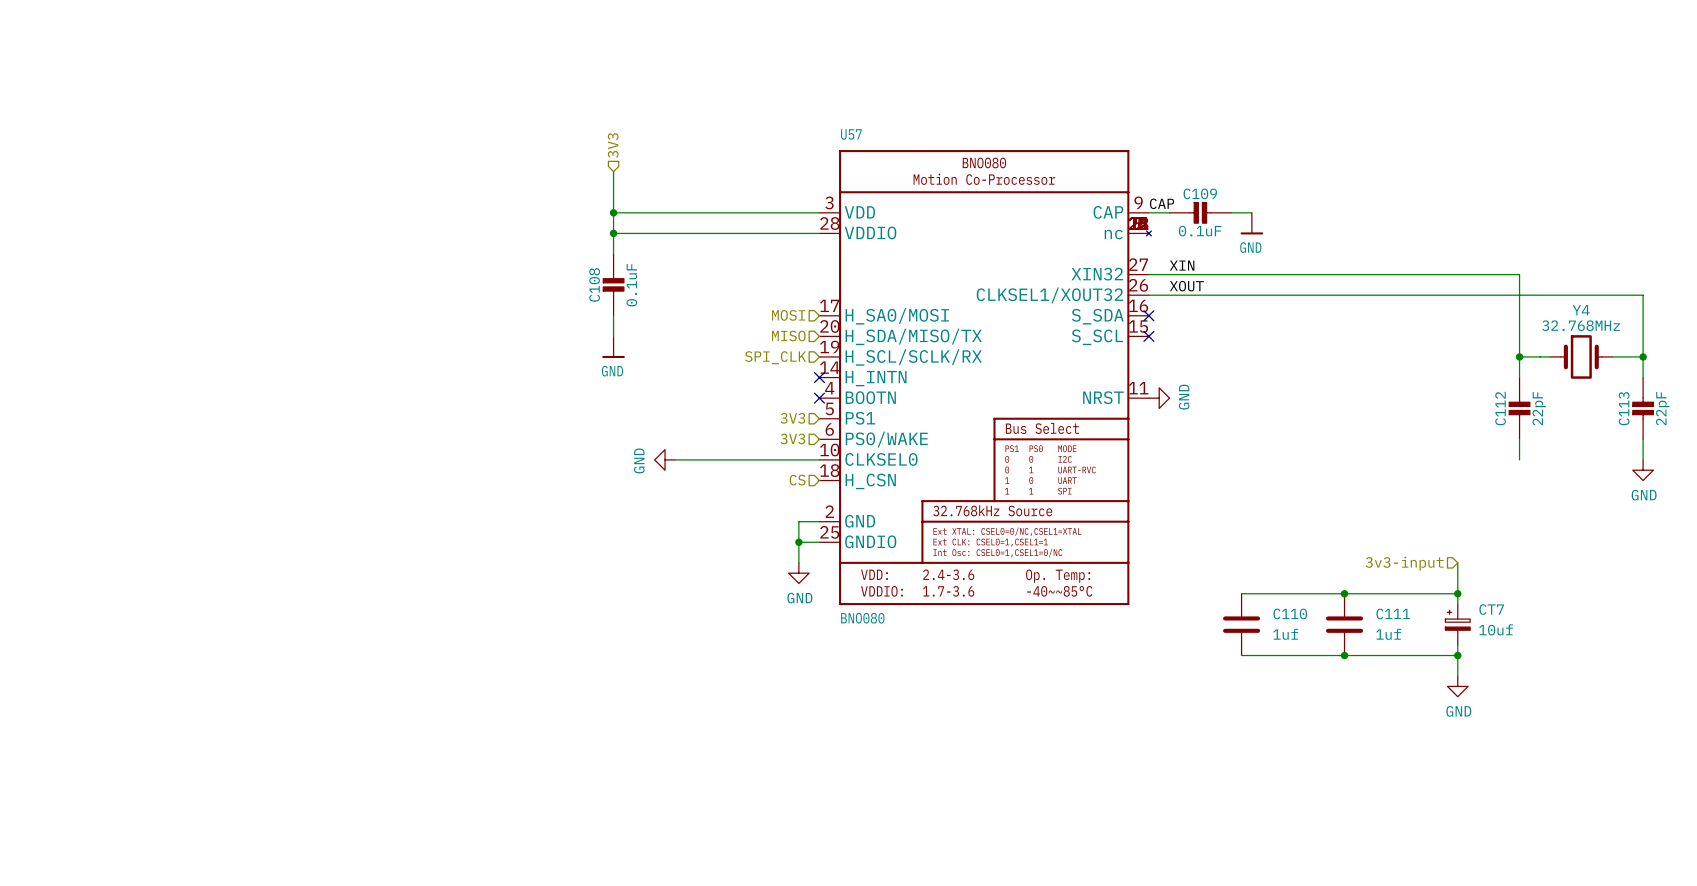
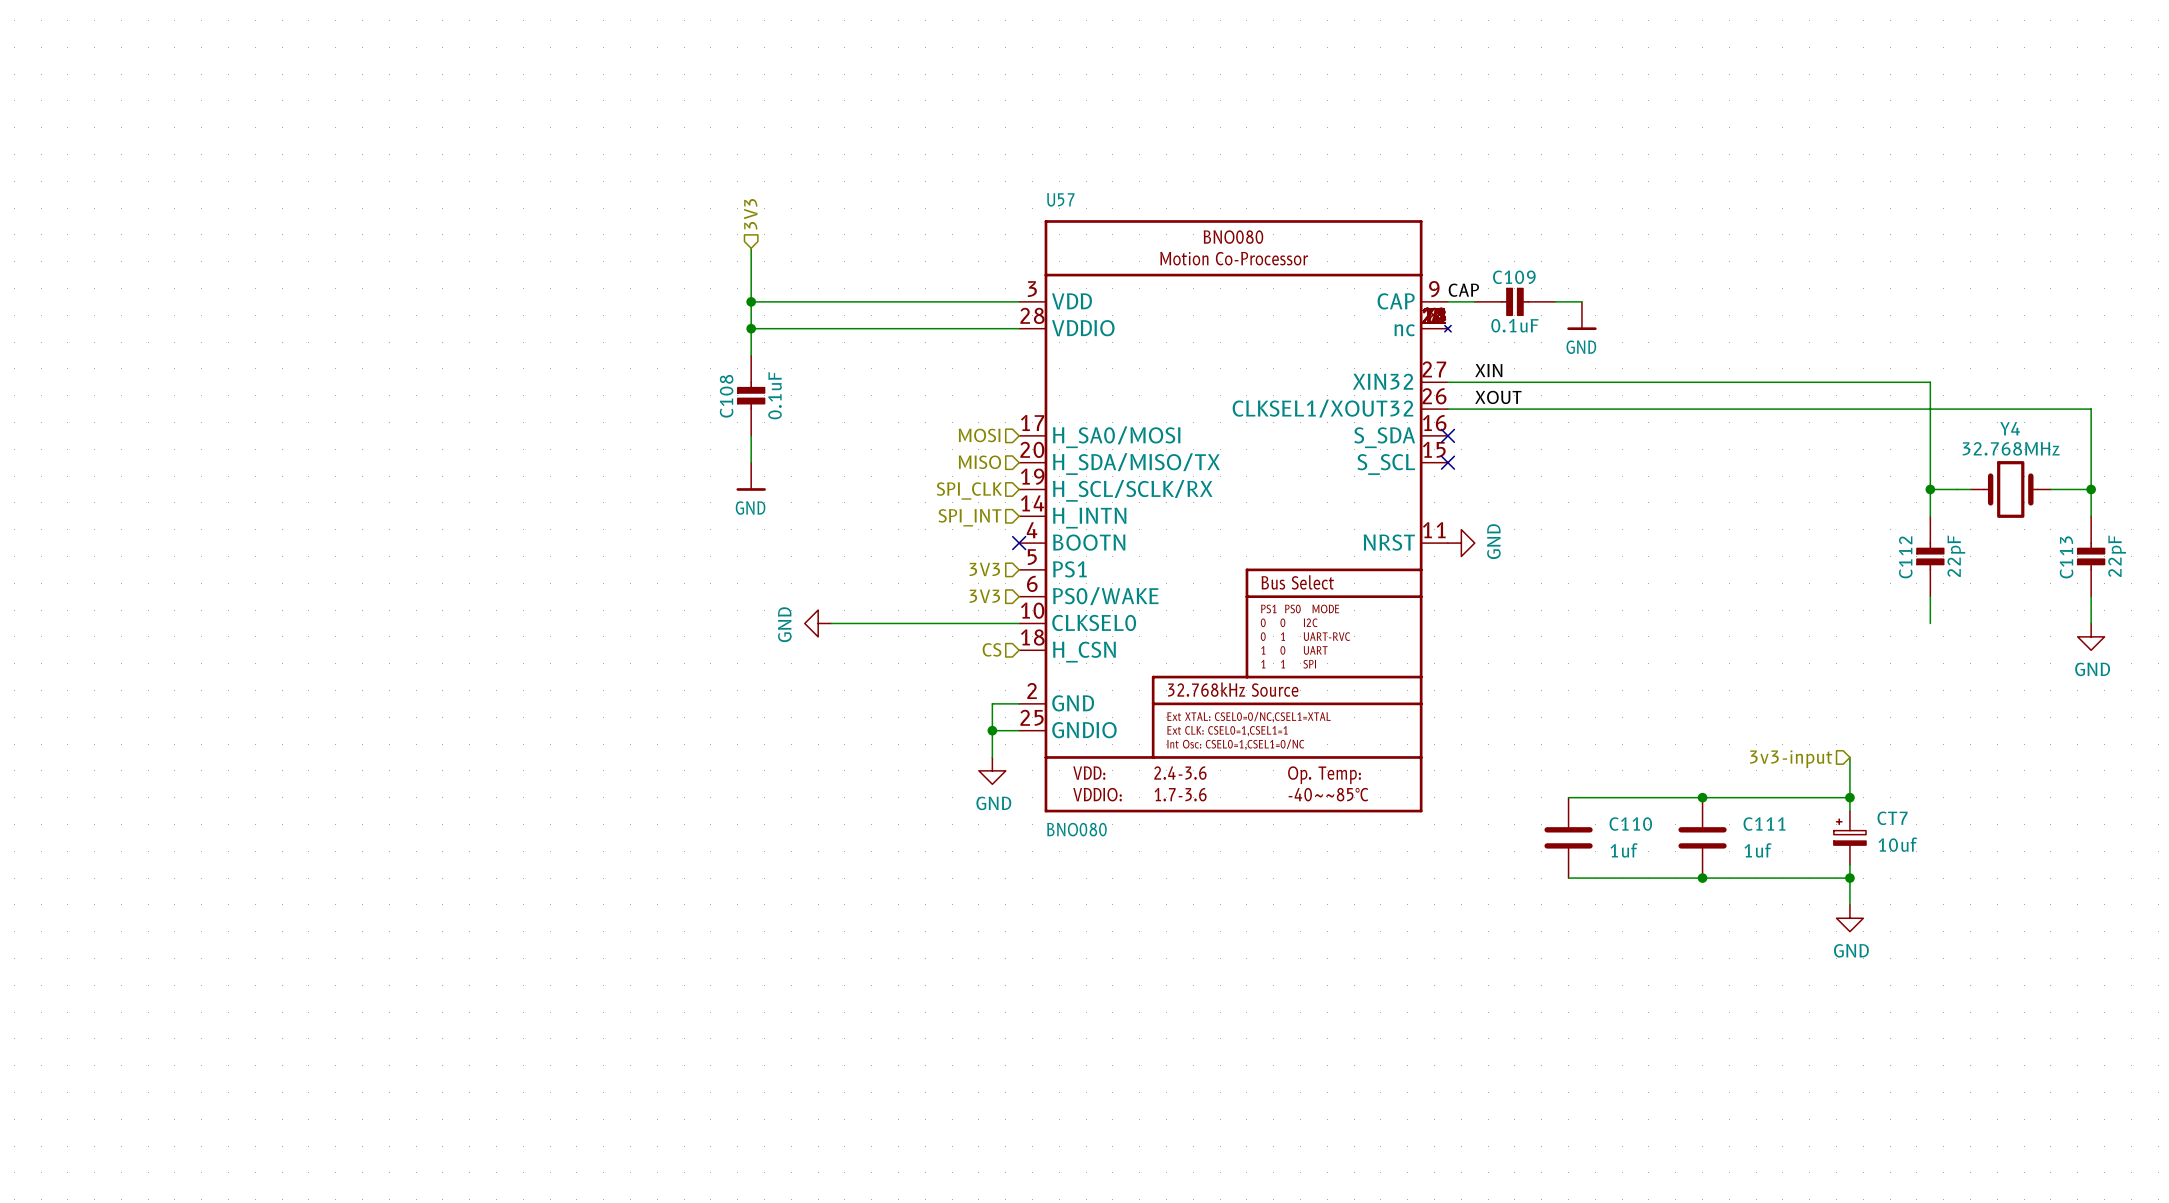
no-connect mark: (819, 377) -> none
hierarchical label: none -> SPI_INT (969, 517)

